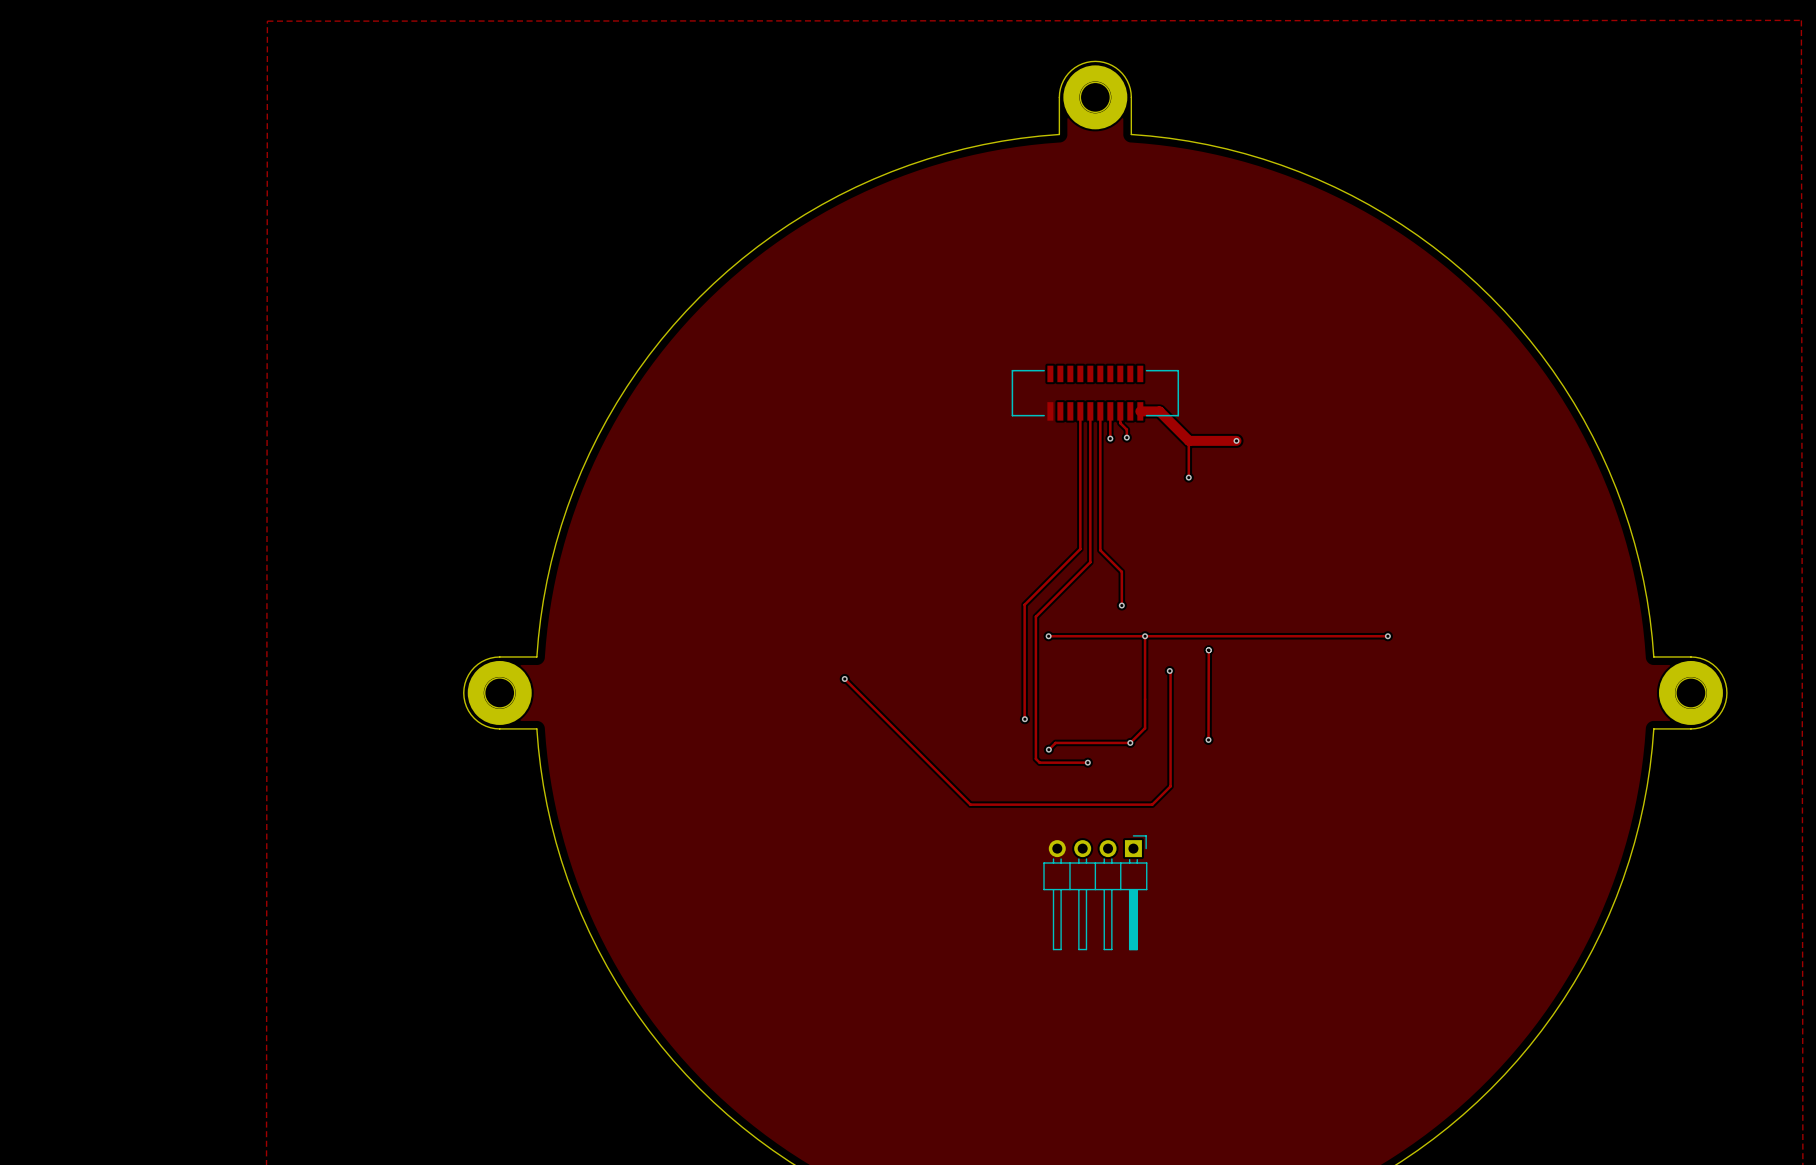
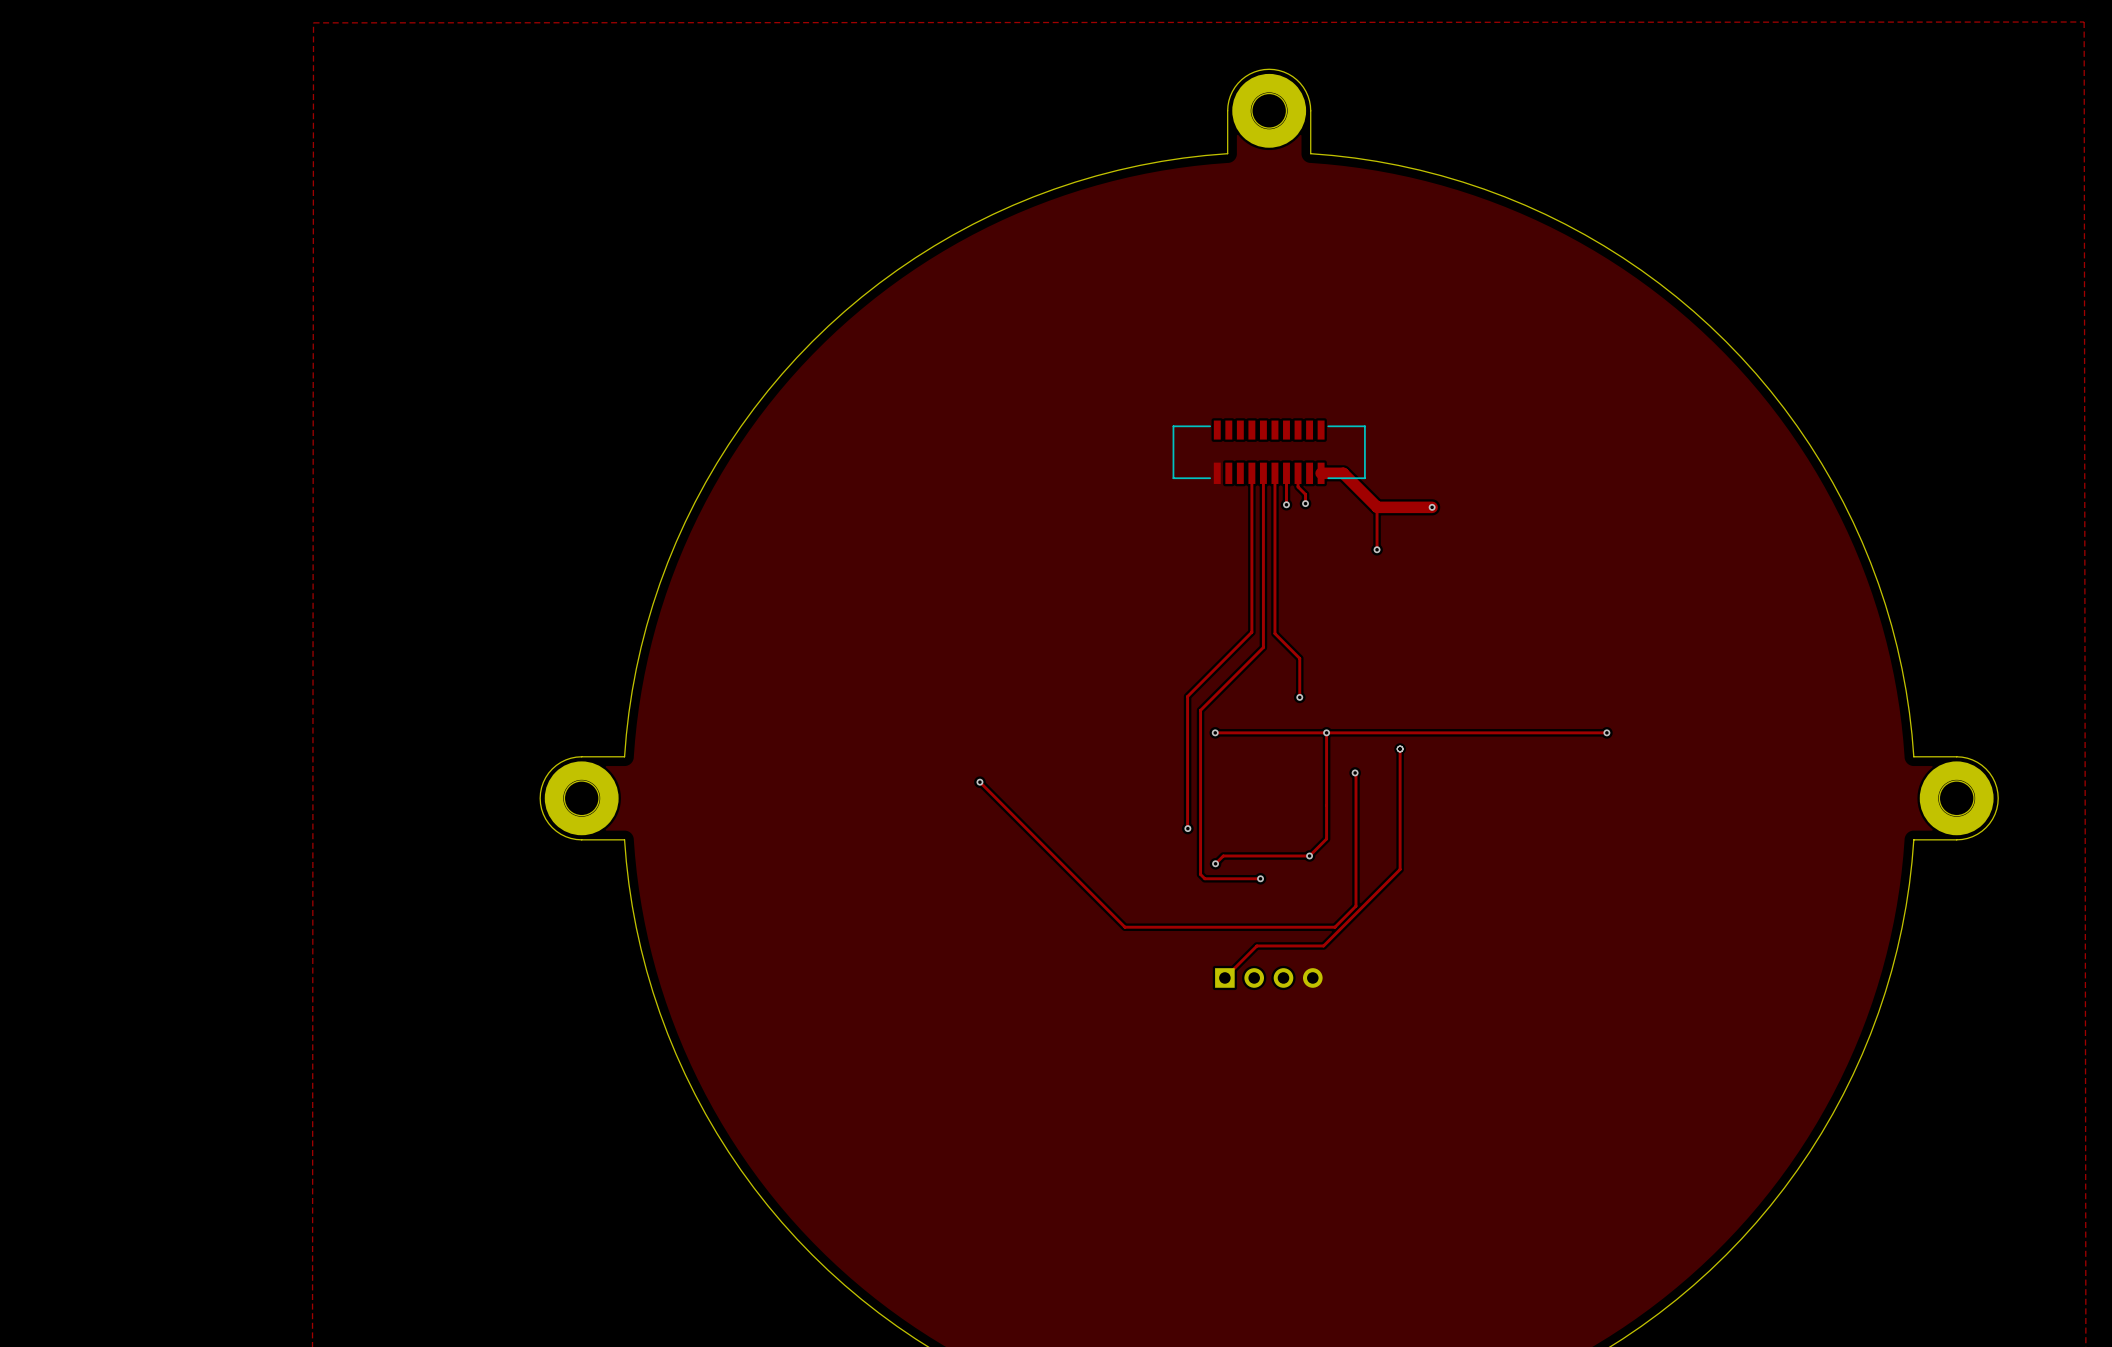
track: (1208, 650) (1208, 739) -> (1400, 749) (1400, 869) (1323, 945) (1256, 945) (1224, 977)
via: (1208, 739) -> none
part side: top (1095, 892) -> bottom (1268, 977)

